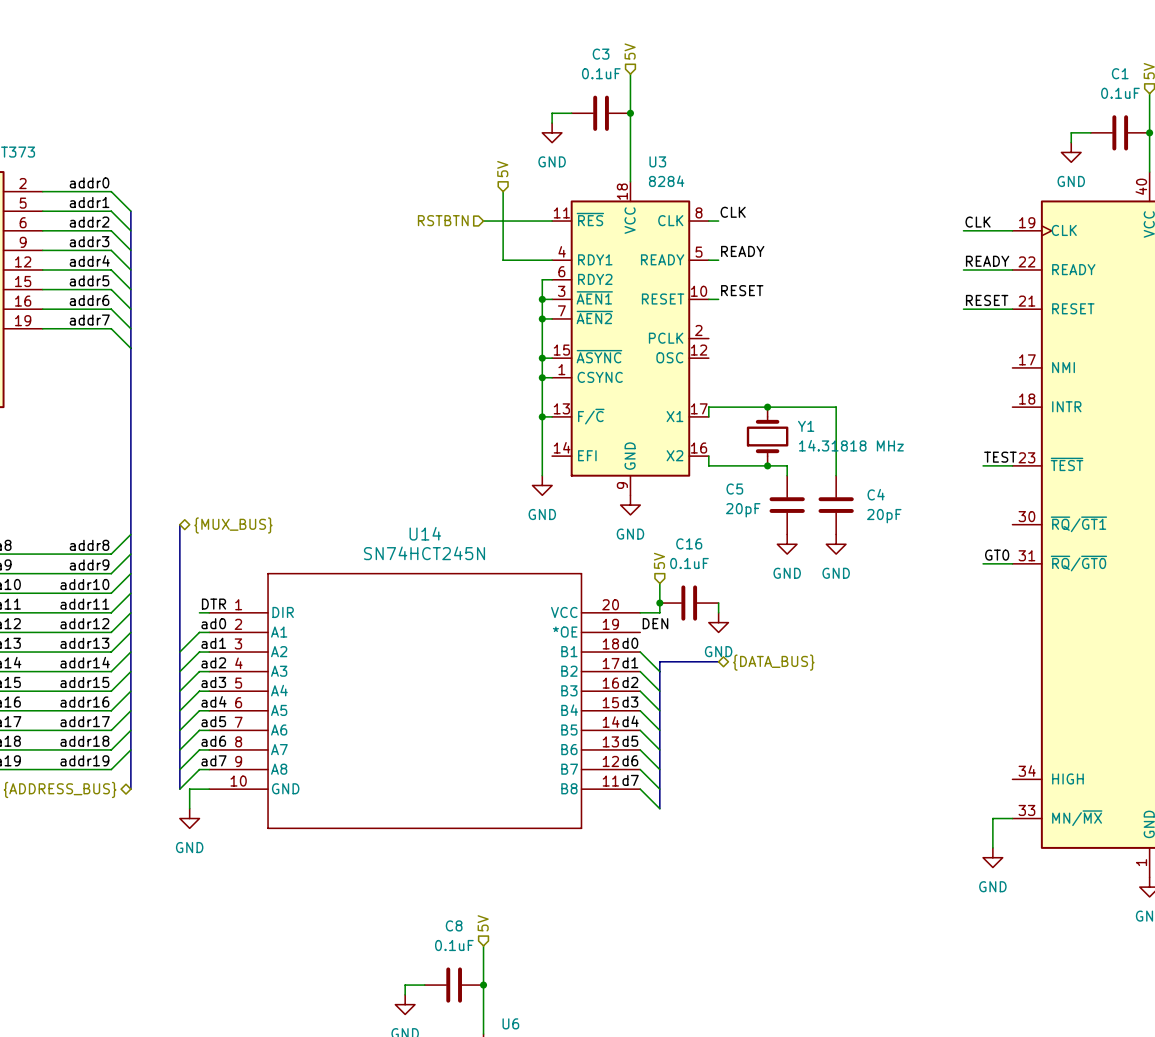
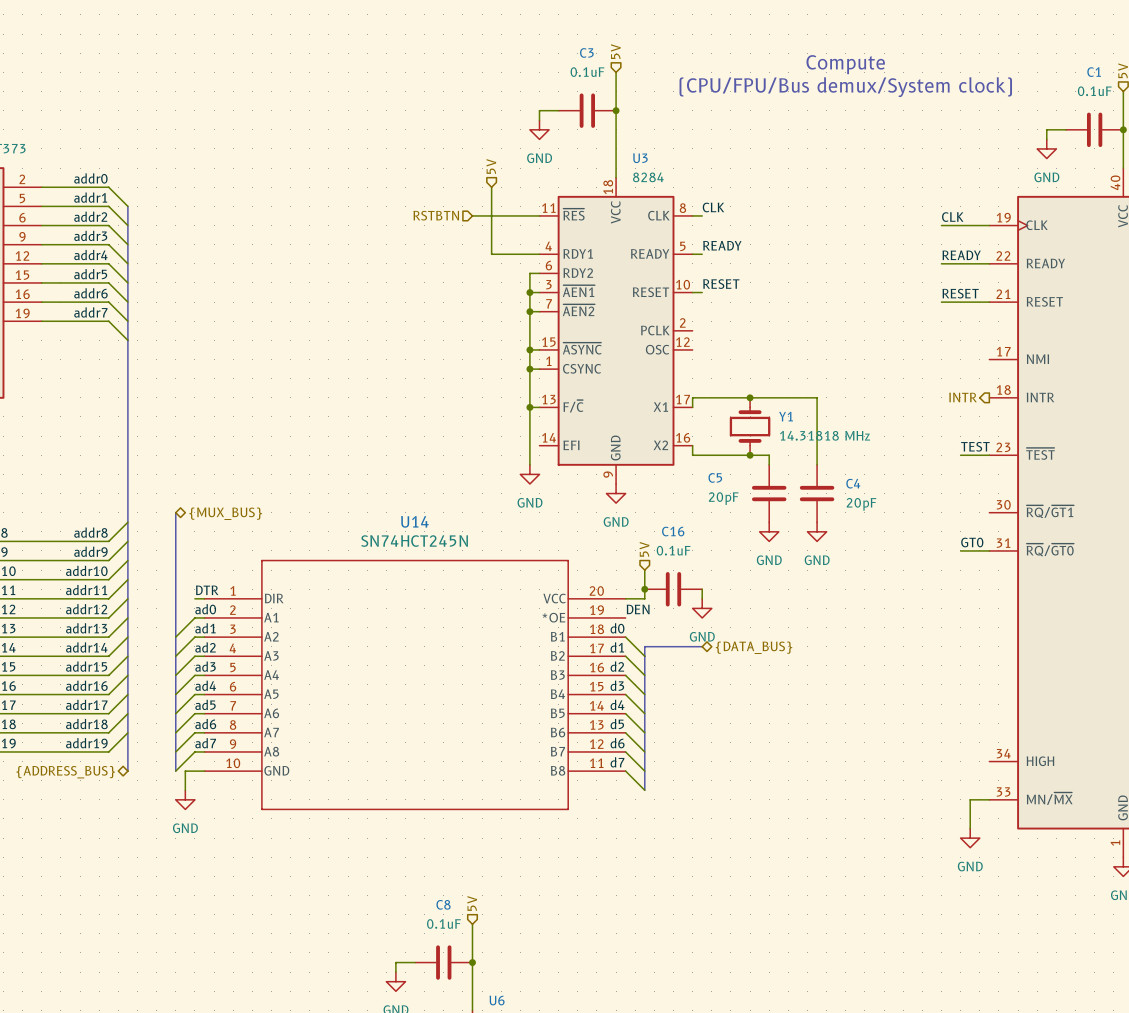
text: none -> Compute (845, 64)
text: none -> (CPU/FPU/Bus demux/System clock) (845, 87)
hierarchical label: none -> INTR (963, 397)

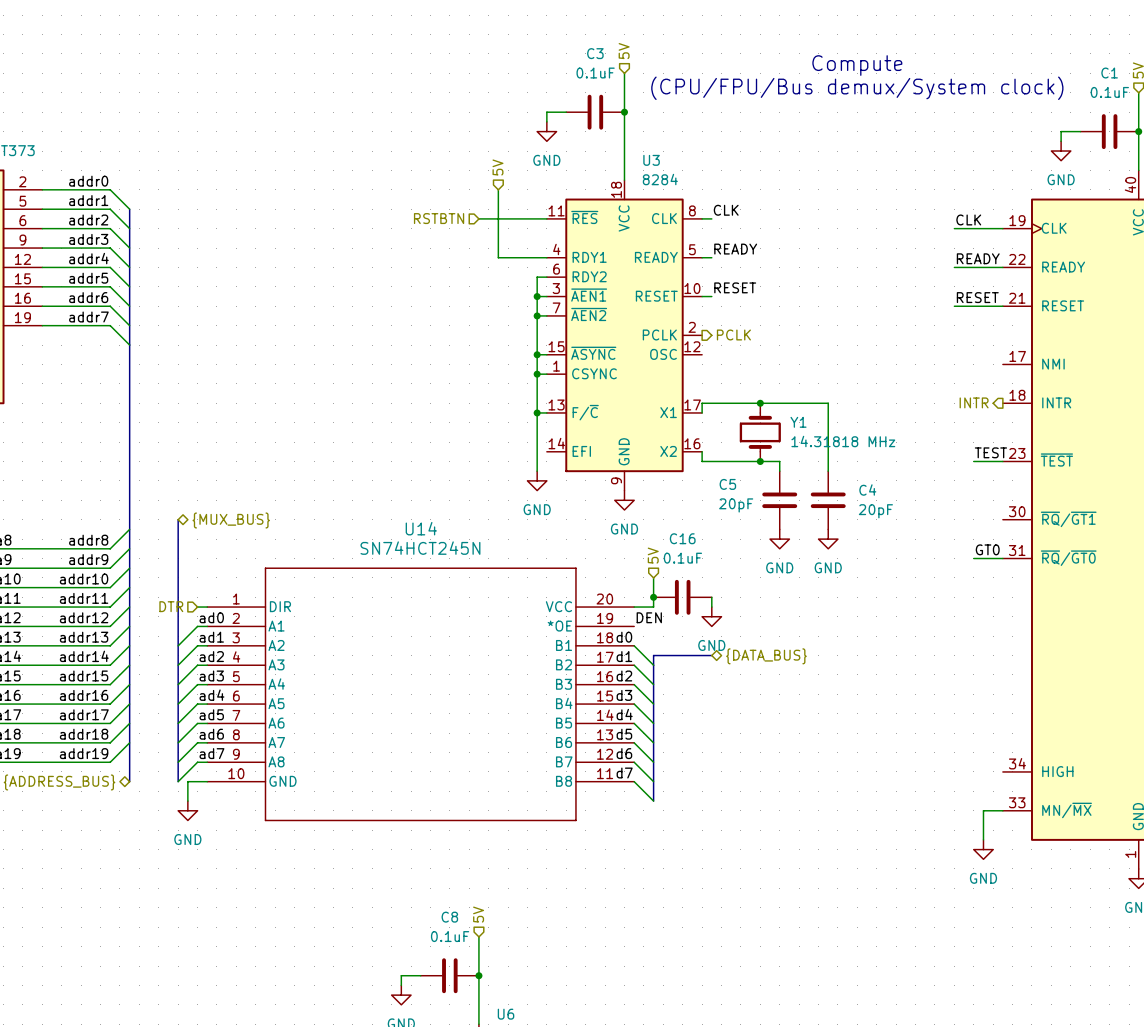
hierarchical label: none -> PCLK (733, 334)
label: DTR (207, 590) -> none
hierarchical label: none -> DTR (171, 606)

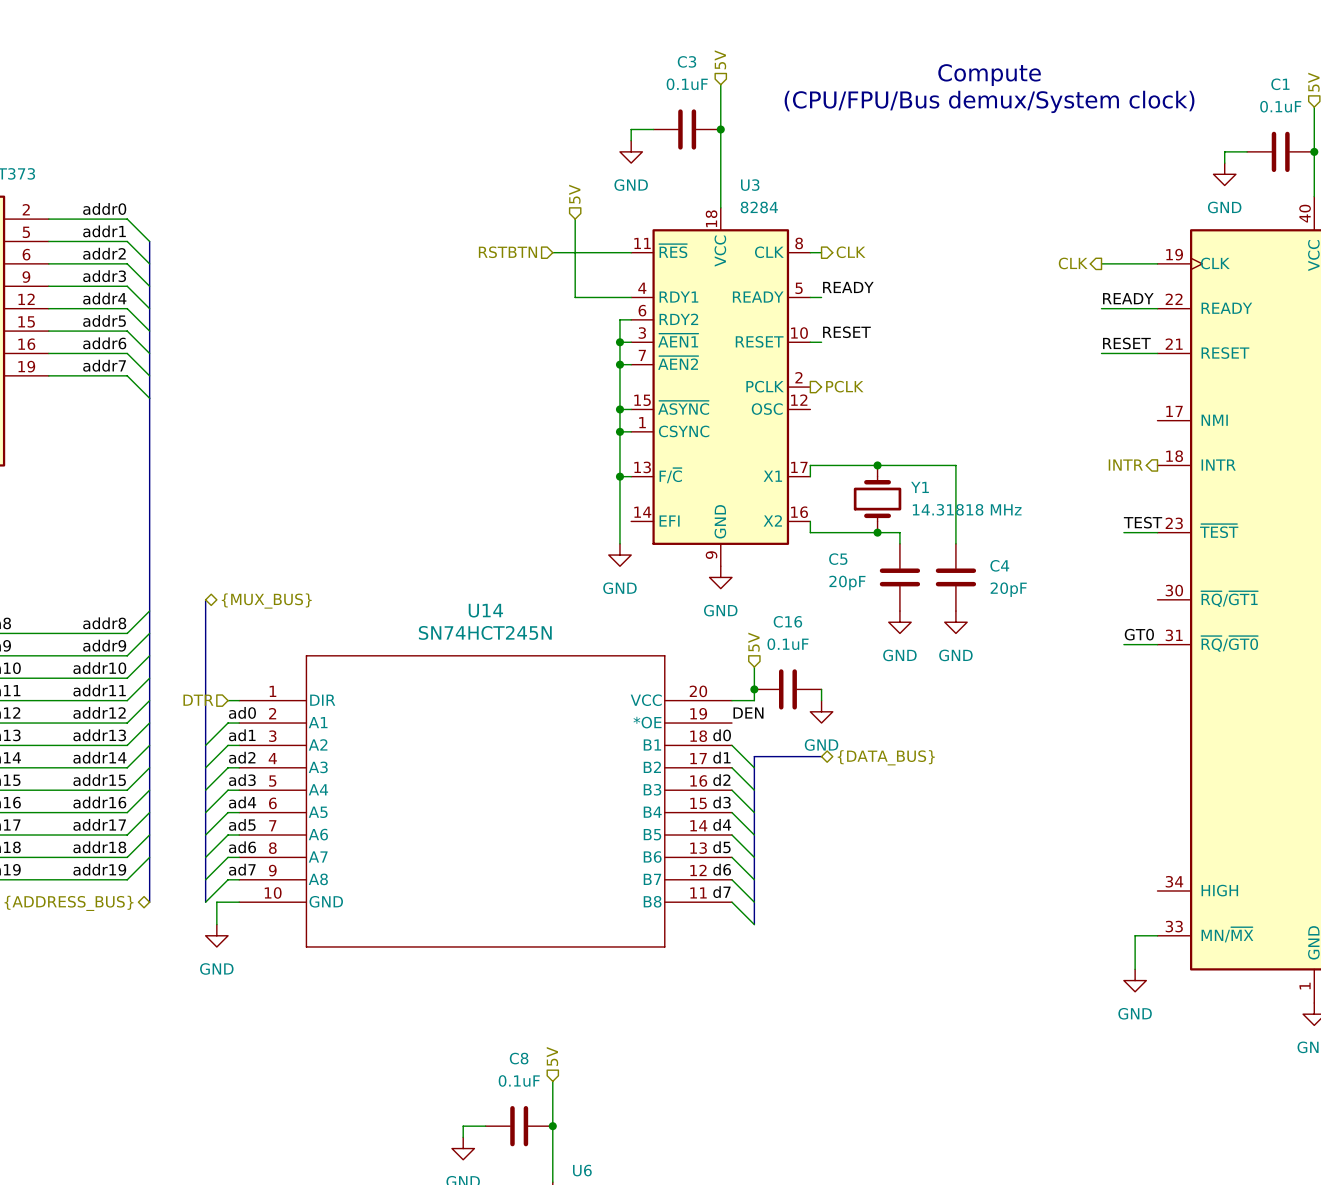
label: CLK (726, 210) -> none
hierarchical label: none -> CLK (851, 252)
label: CLK (968, 219) -> none
hierarchical label: none -> CLK (1073, 263)

